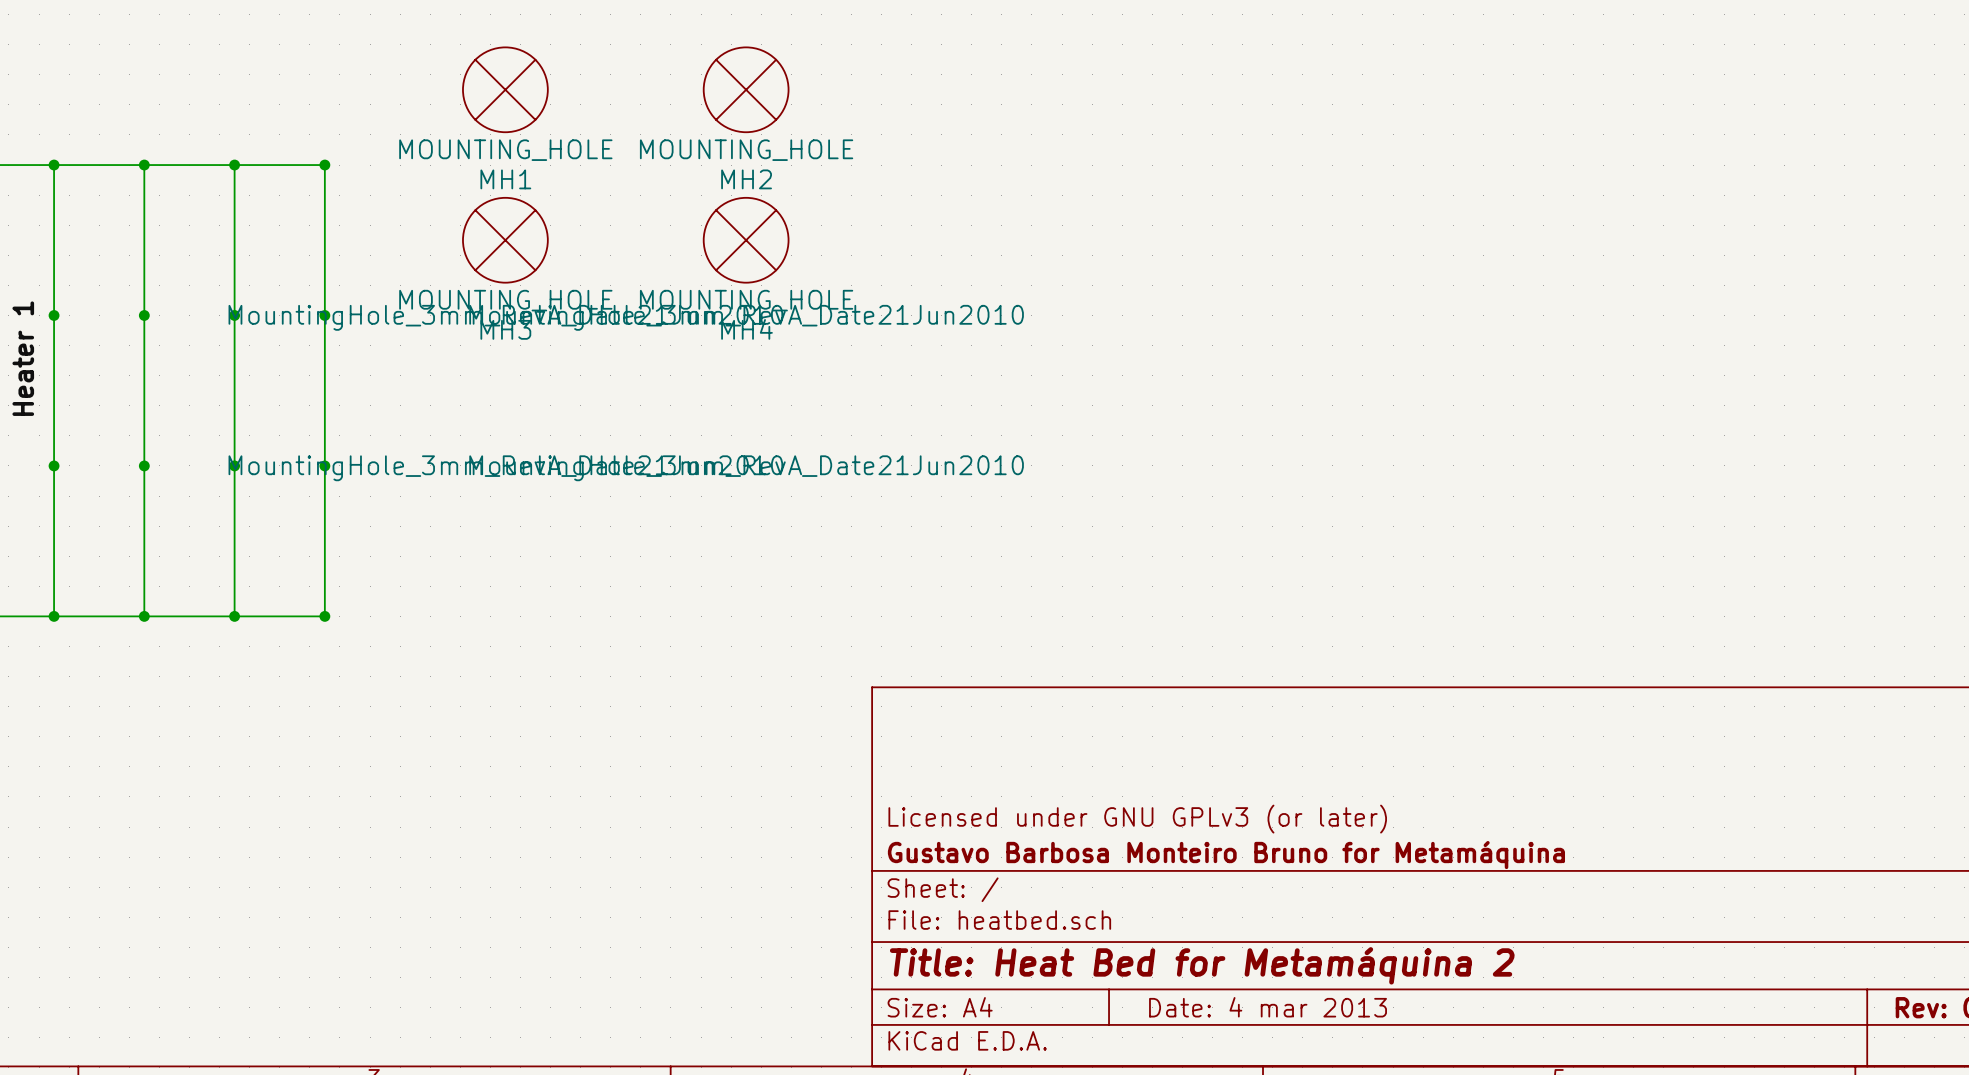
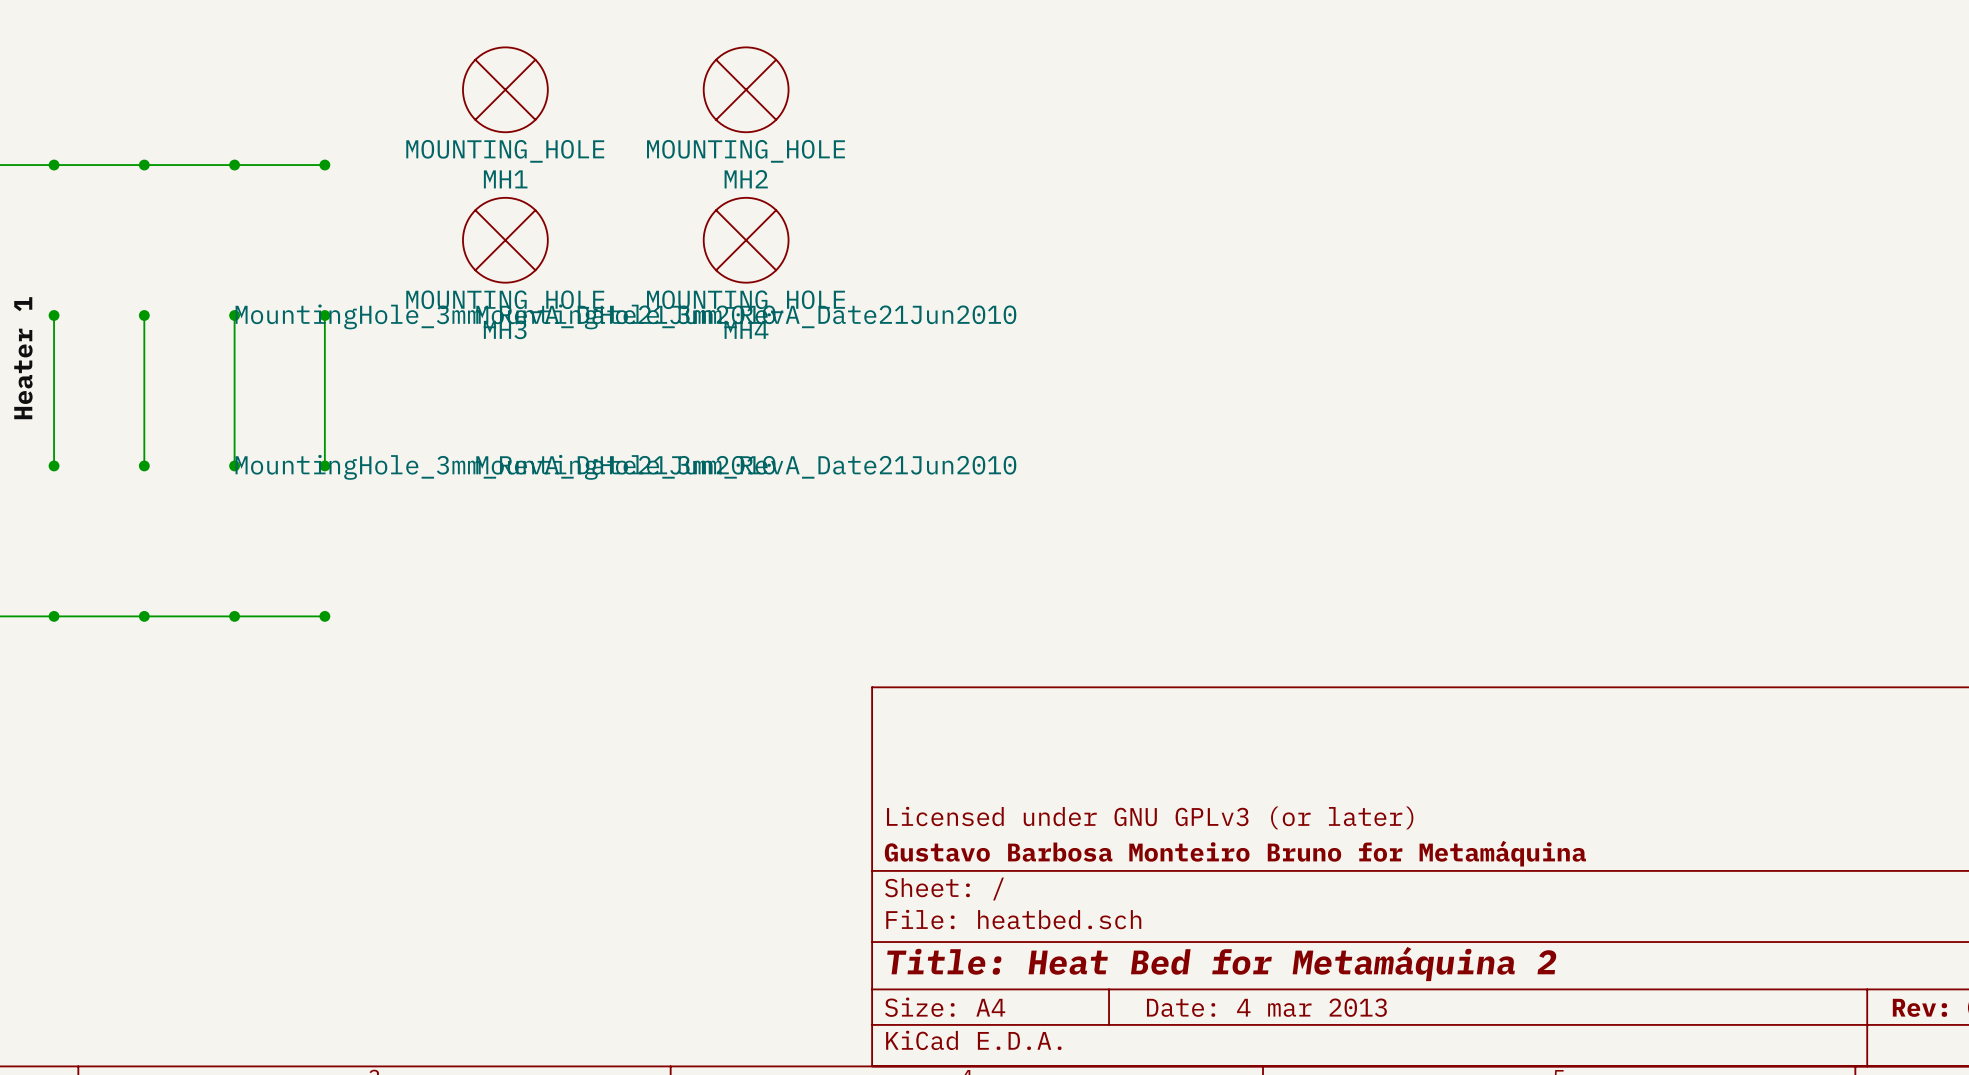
wire: (54, 165) (54, 315) -> none
wire: (144, 165) (144, 315) -> none
wire: (234, 165) (234, 315) -> none
wire: (324, 165) (324, 315) -> none
wire: (54, 465) (54, 616) -> none
wire: (144, 465) (144, 616) -> none
wire: (234, 465) (234, 616) -> none
wire: (324, 465) (324, 616) -> none

